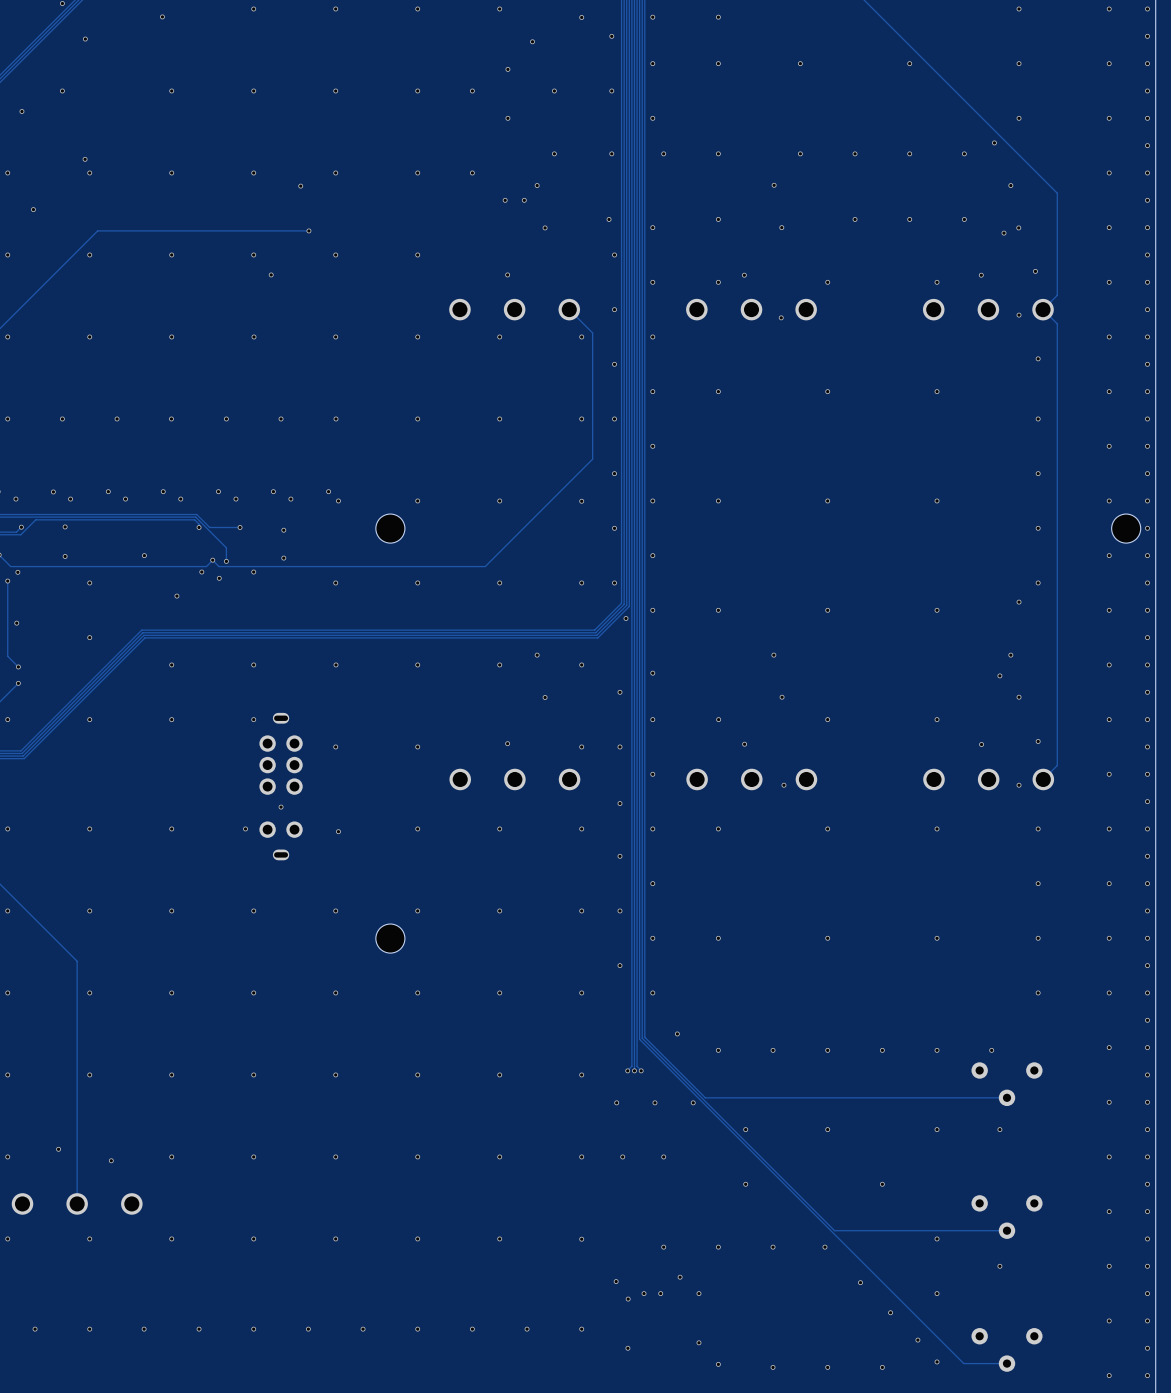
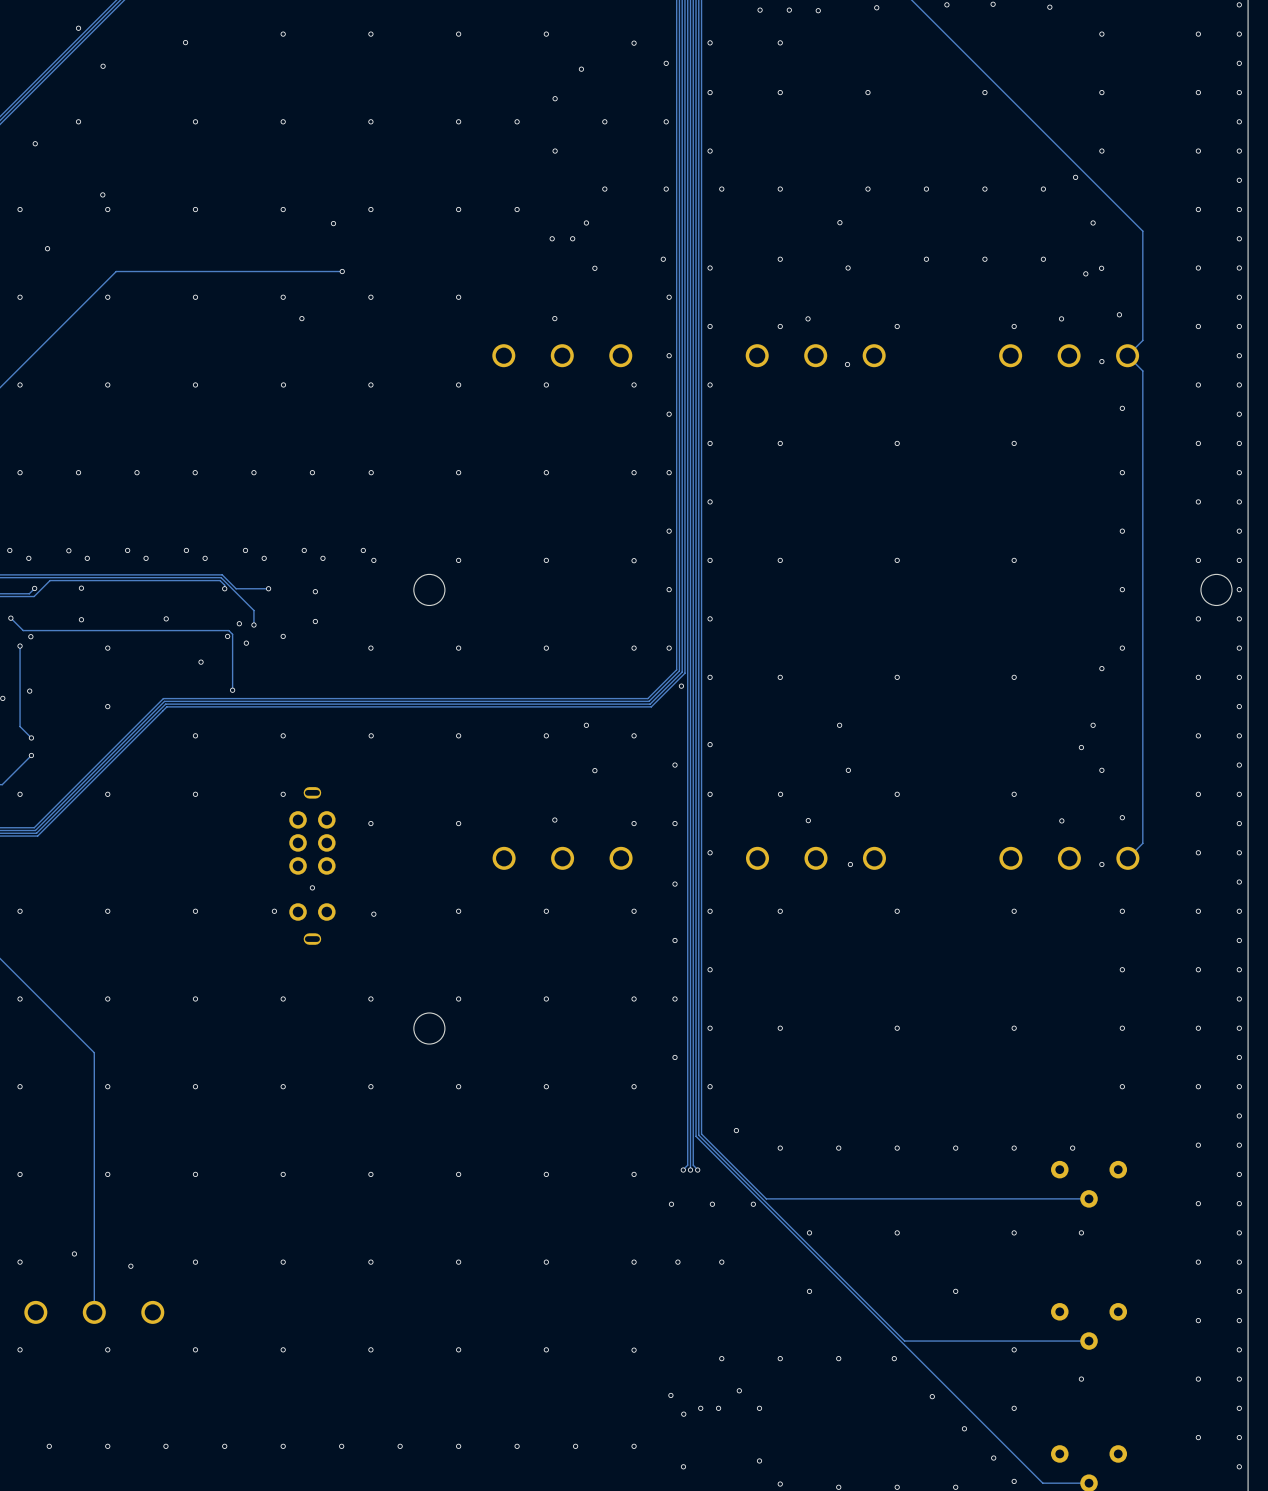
track: (569, 309) (592, 332) (592, 459) (485, 566) (219, 566) (212, 560) (206, 566) (202, 566) -> (232, 690) (232, 634) (228, 630)
via: none -> (232, 690)

